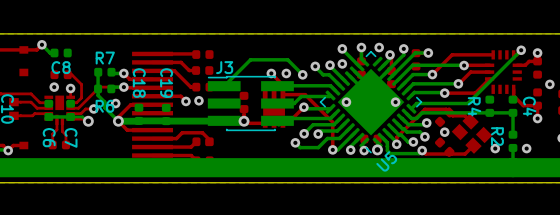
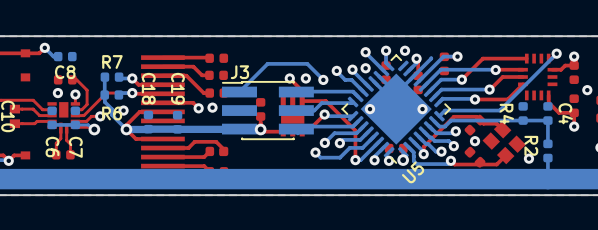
via: (403, 48) -> none
via: (526, 148) -> none

